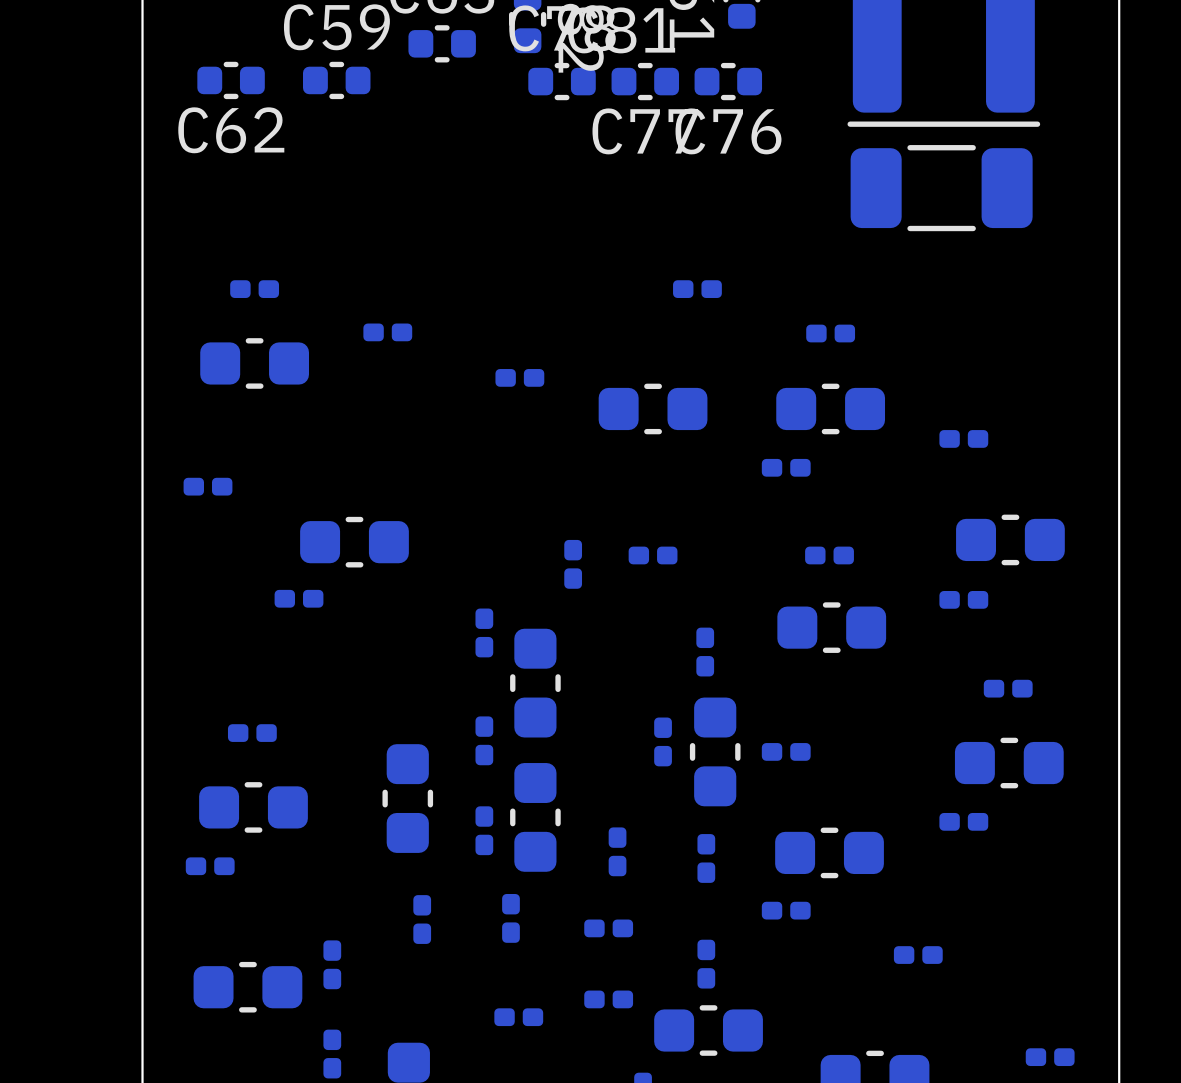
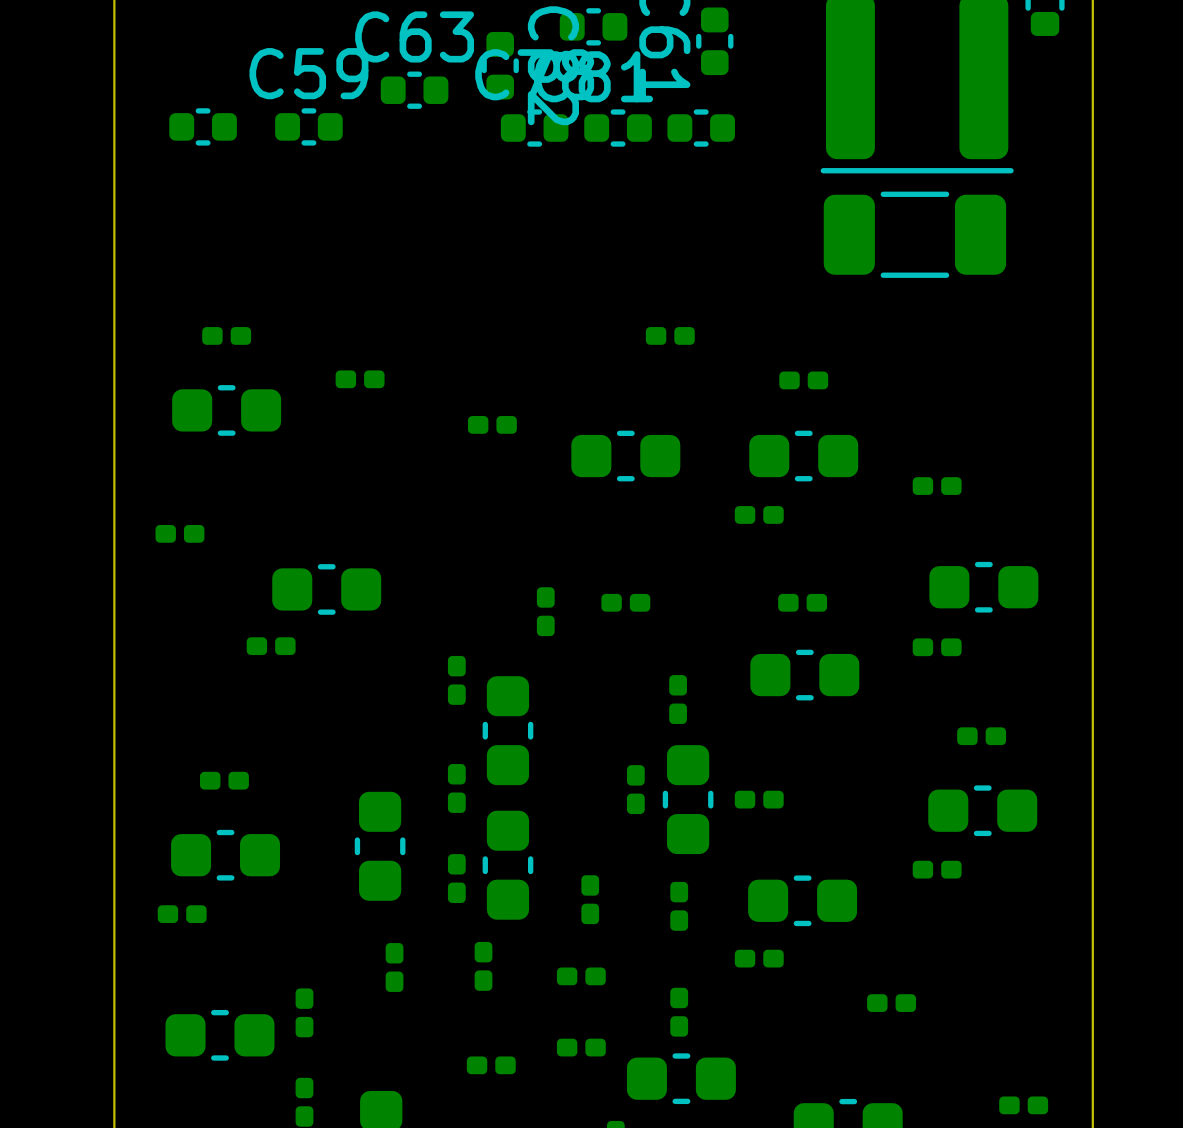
C62 name: C62 (231, 130) -> none
C77 name: C77 (645, 131) -> none
C76 name: C76 (728, 131) -> none

